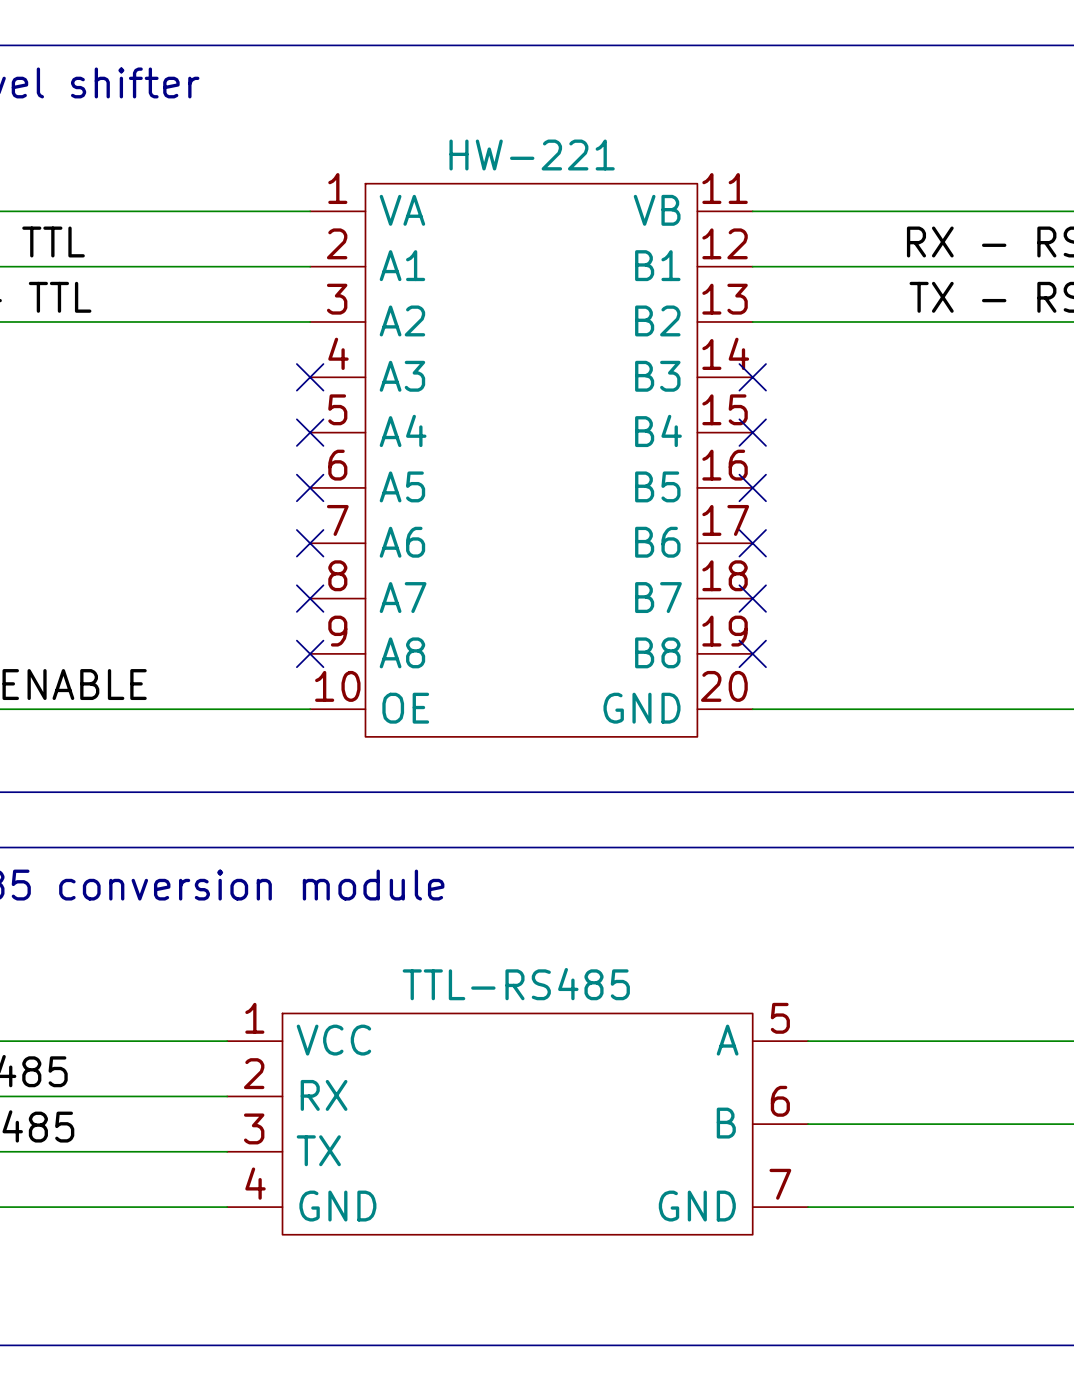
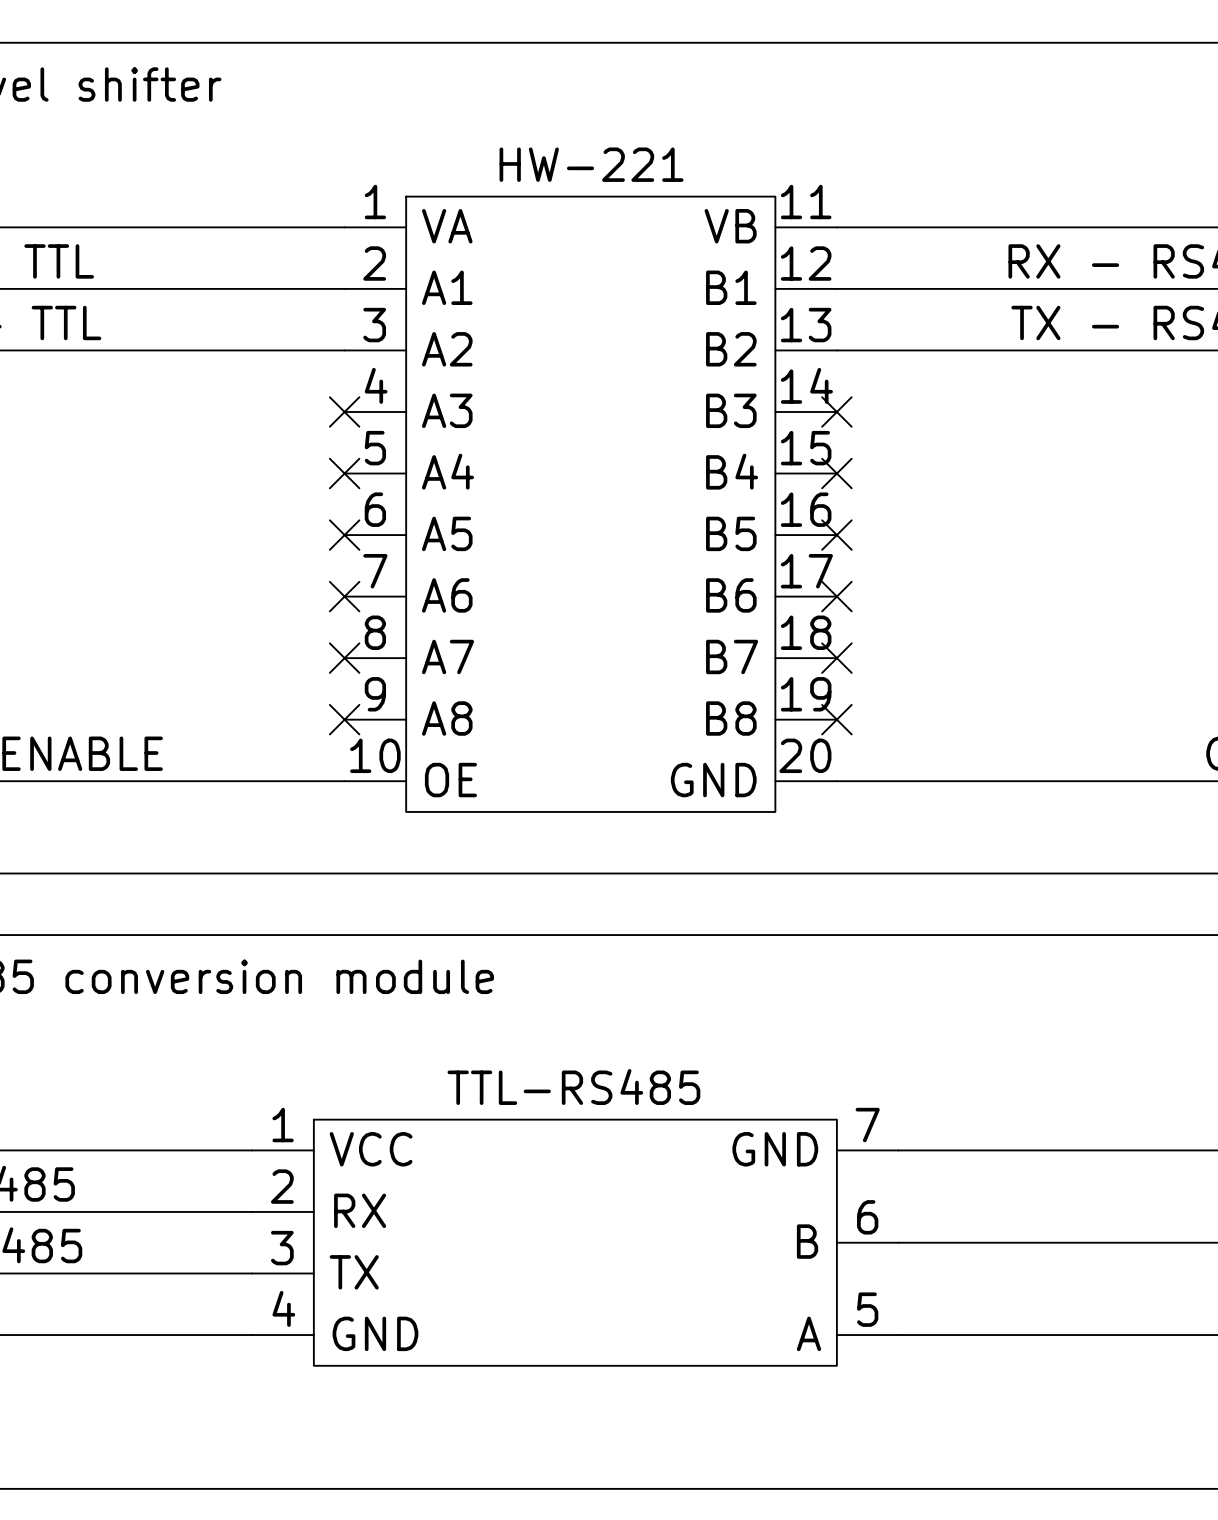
part pin number: 5 (780, 1018) -> 7 (867, 1125)
part pin name: A (727, 1040) -> GND (775, 1149)
part pin number: 7 (780, 1184) -> 5 (867, 1309)
part pin name: GND (697, 1206) -> A (809, 1333)

